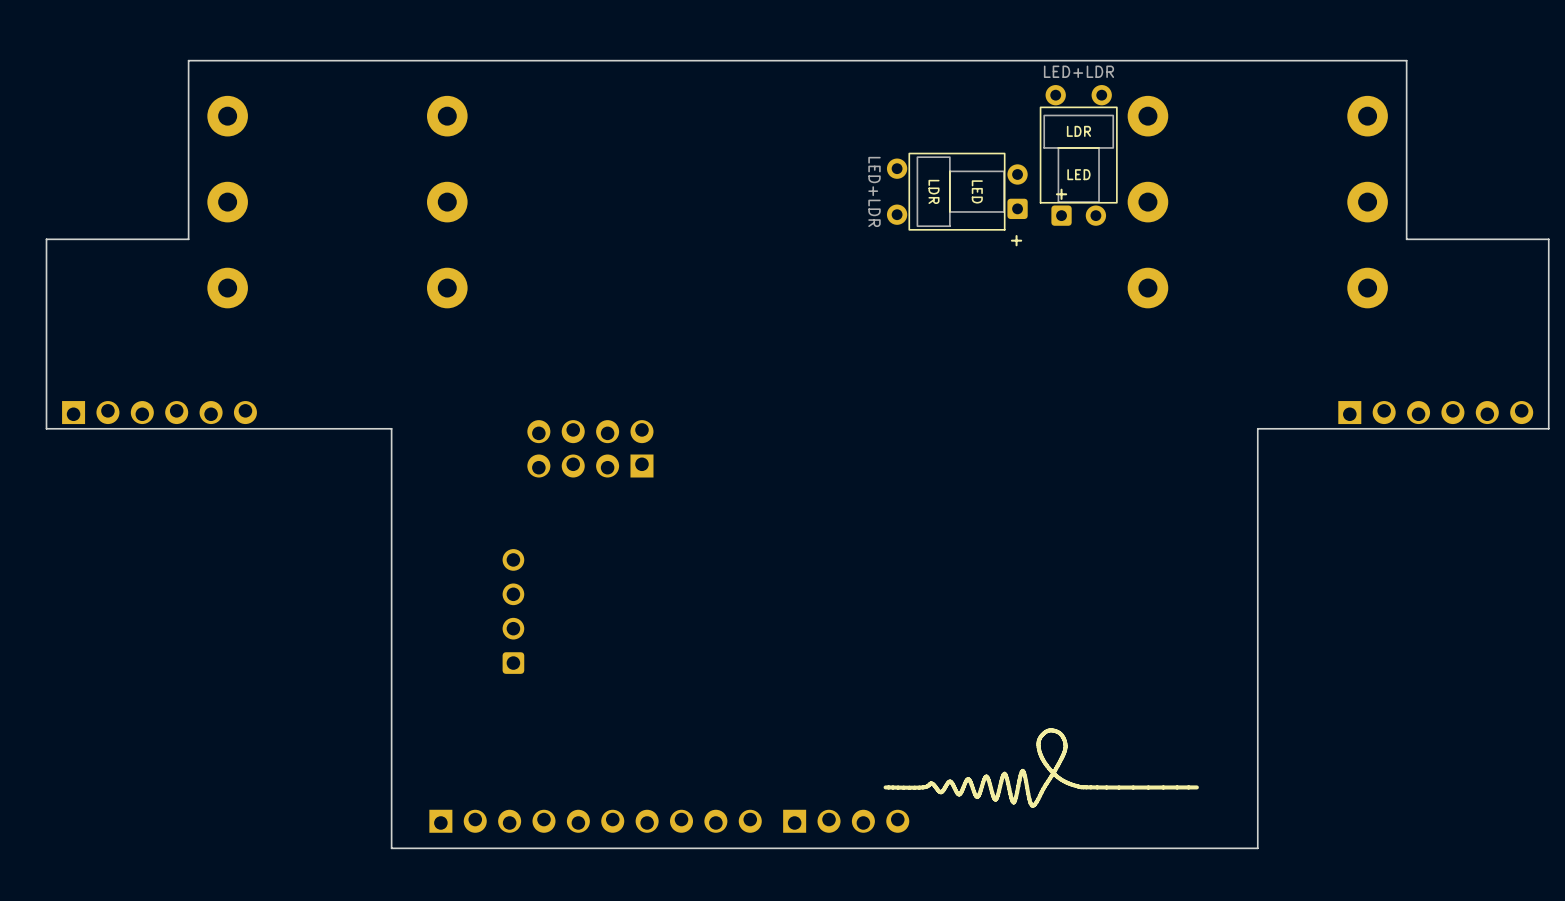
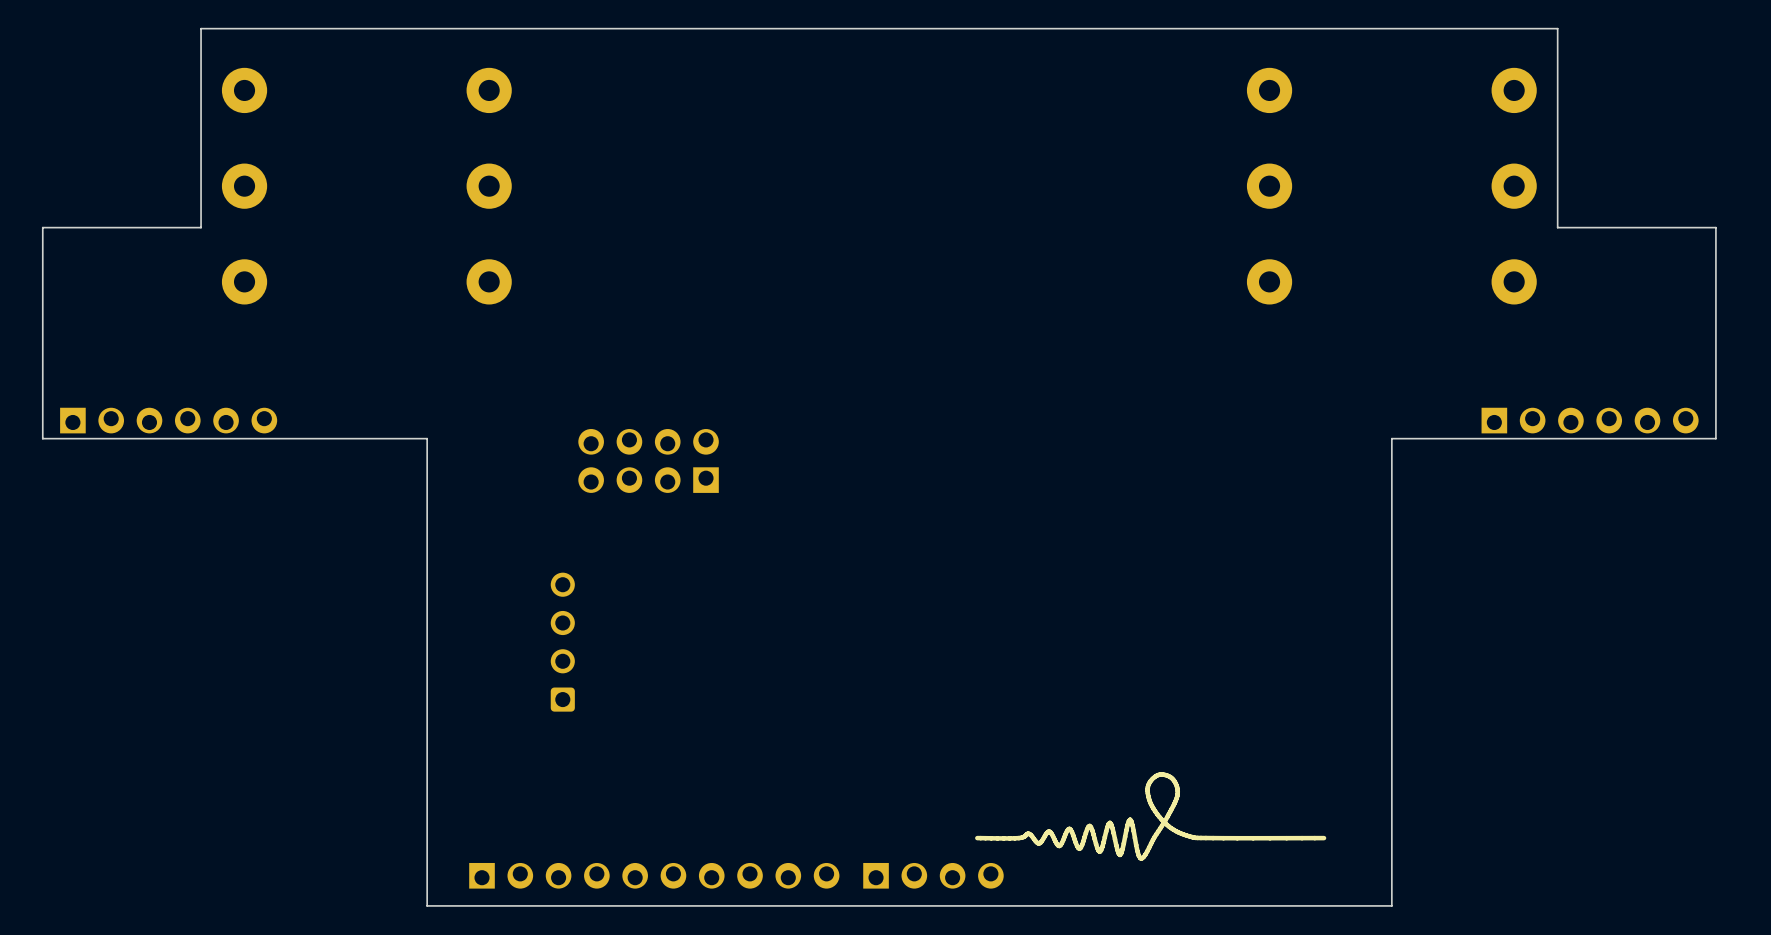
part: LED+LDR (1078, 155) -> none
part: LED+LDR (957, 191) -> none

